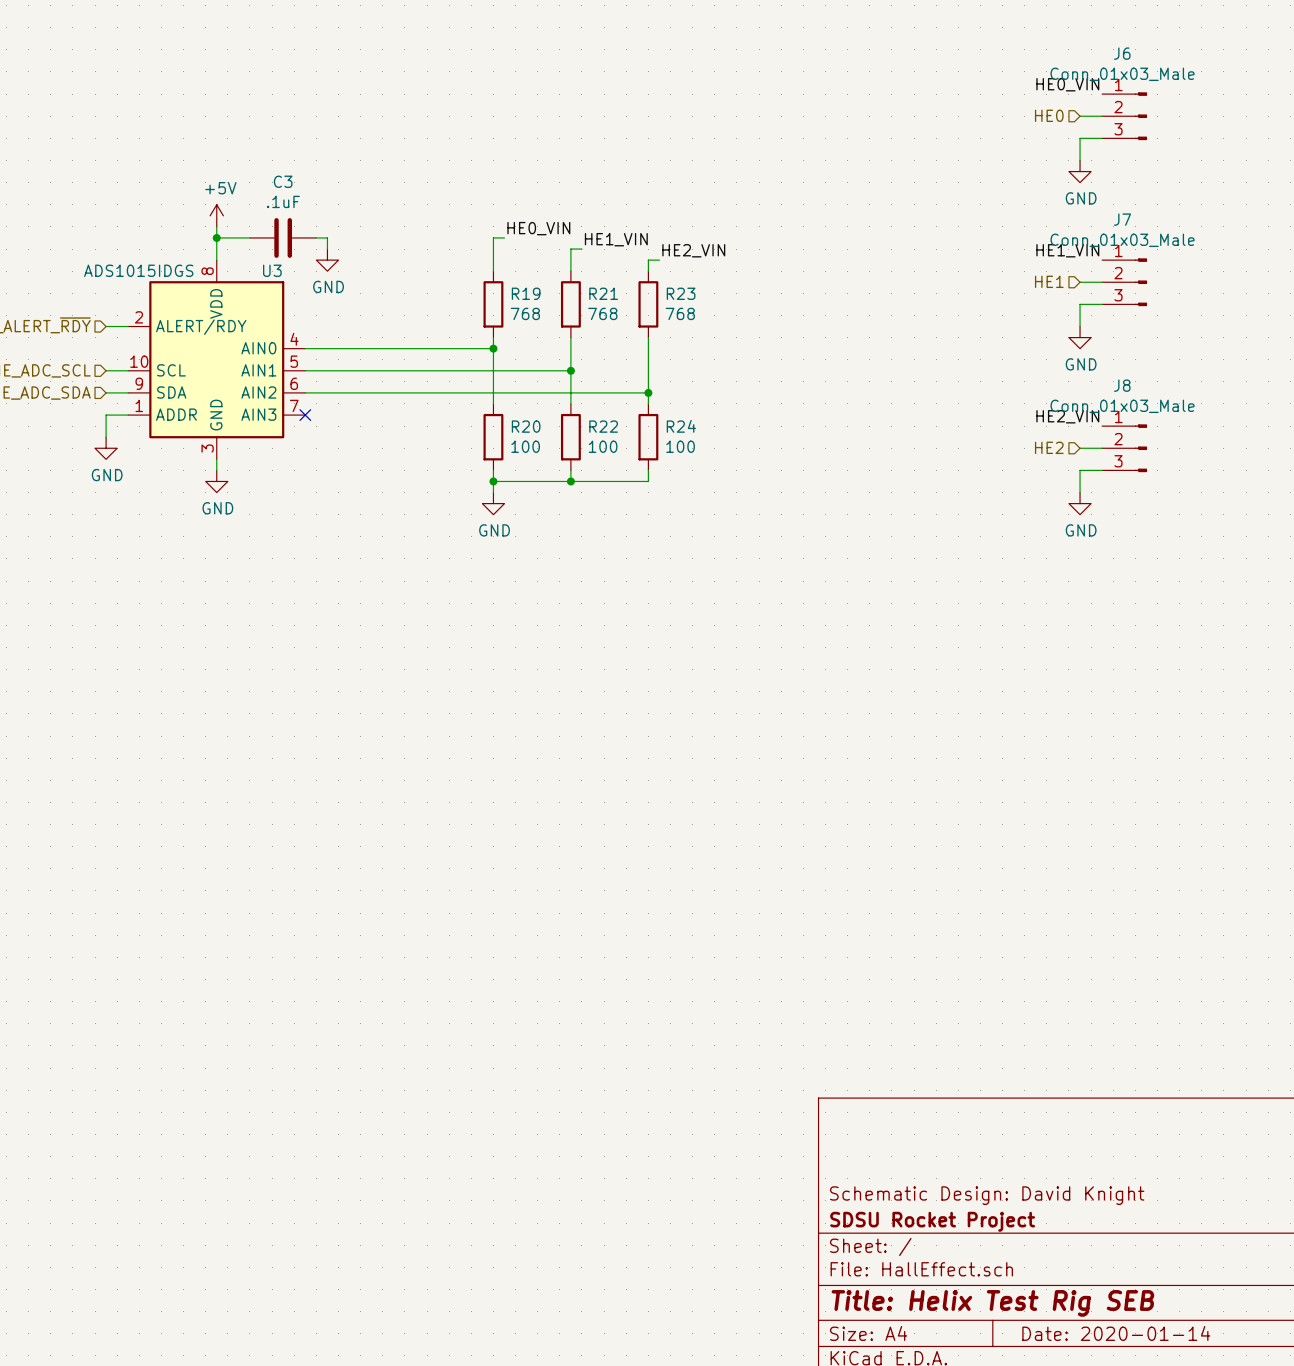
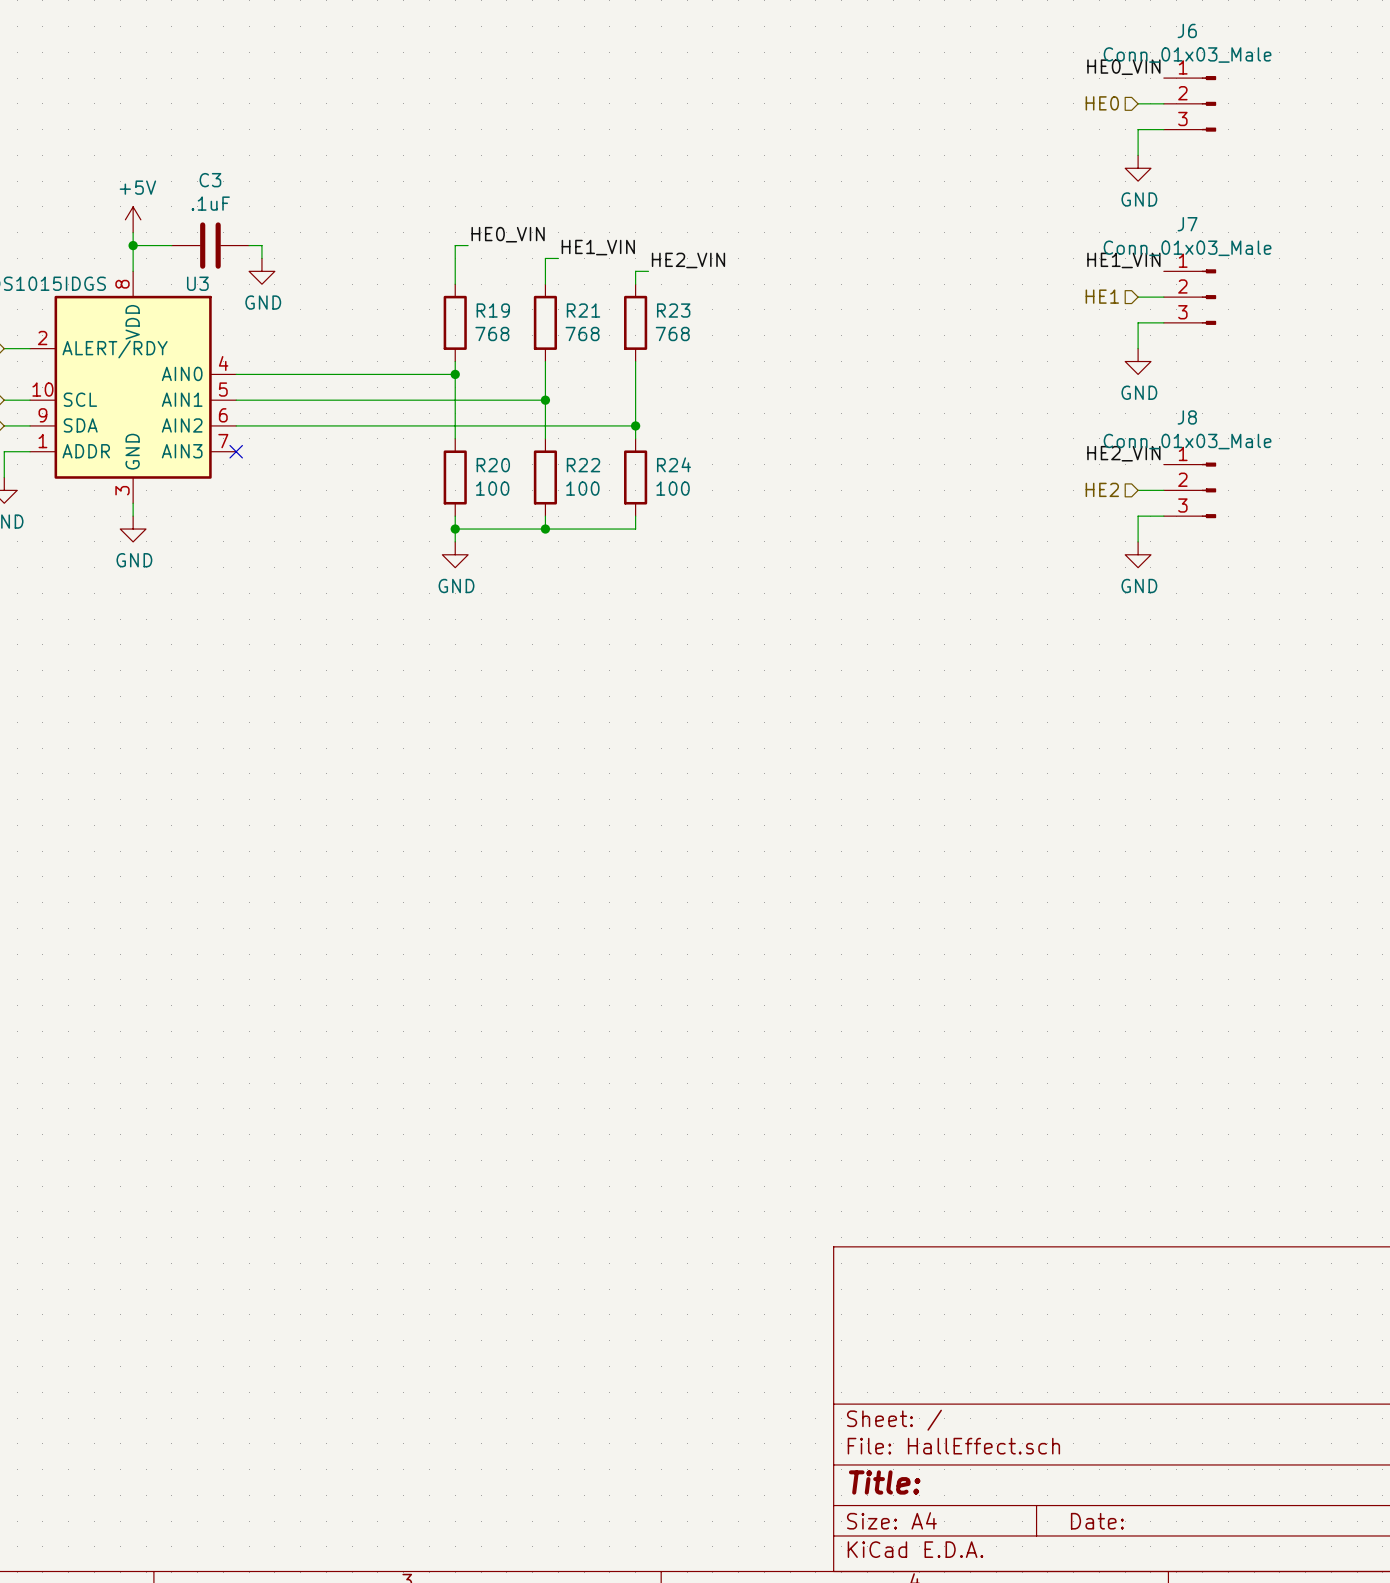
title block: Schematic Design: David Knight (987, 1195) -> none
title block: SDSU Rocket Project (932, 1221) -> none
title block: Title: Helix Test Rig SEB (992, 1303) -> Title: (884, 1482)
title block: Date: 2020-01-14 (1116, 1333) -> Date: (1097, 1521)

